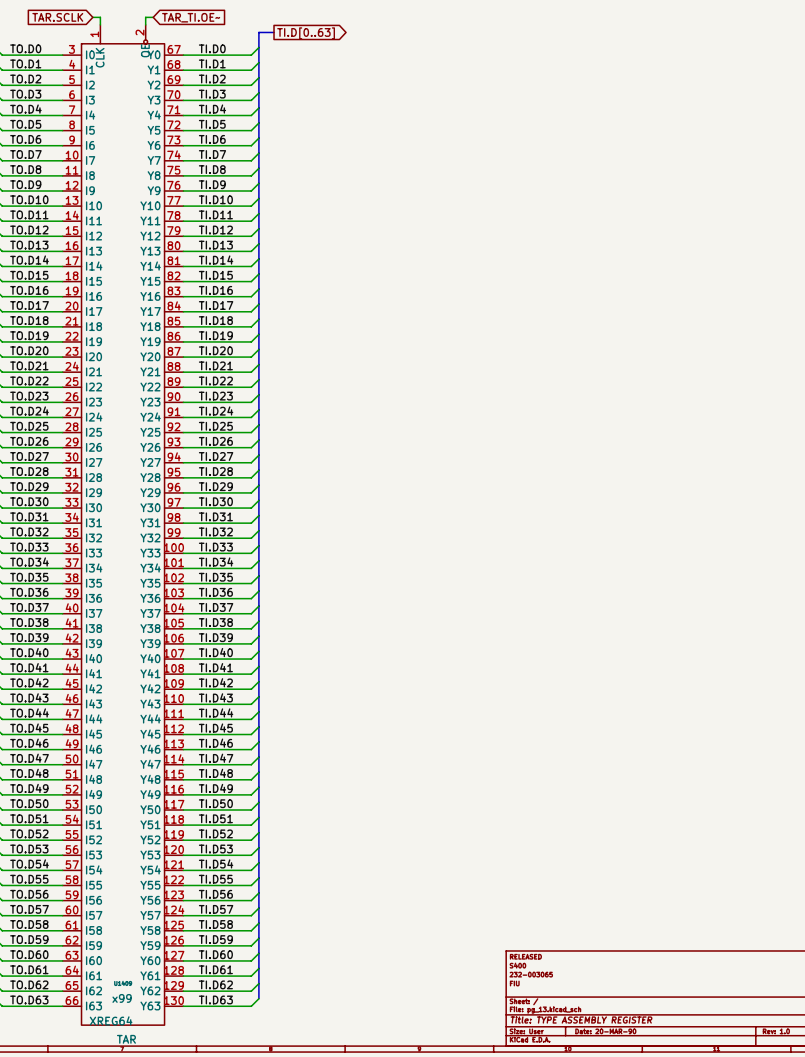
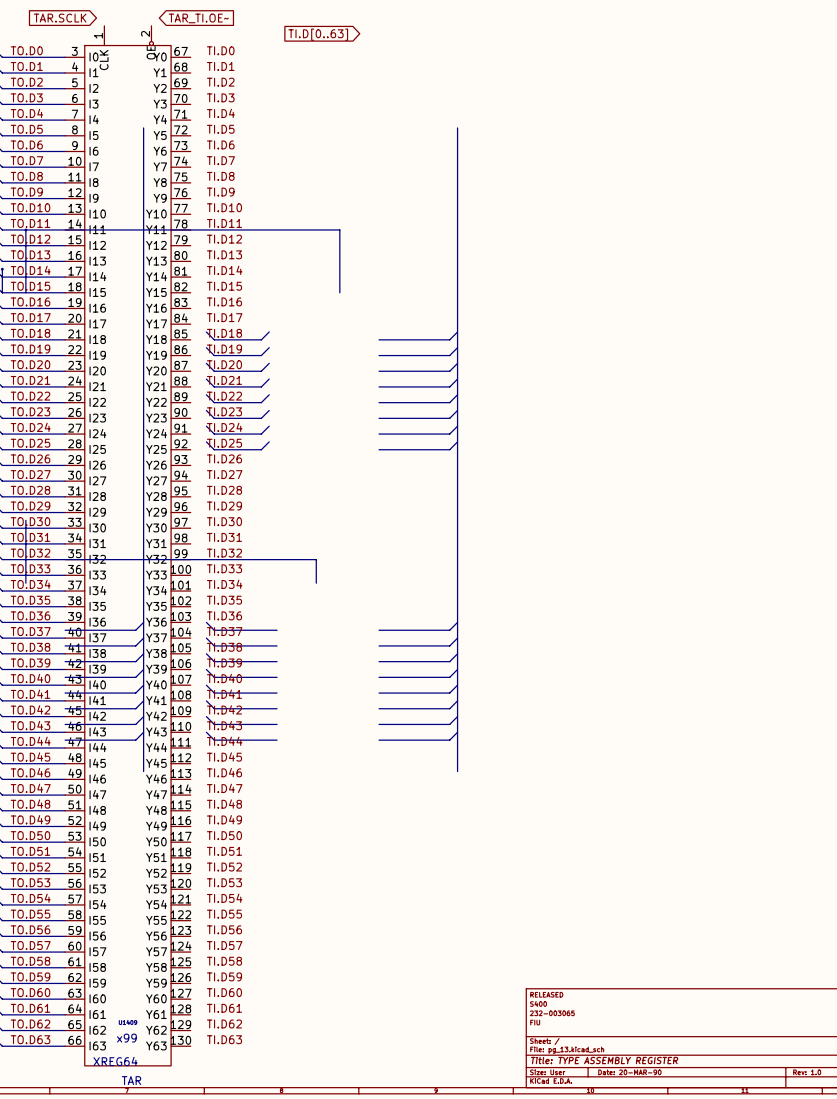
wire: (92, 17) (100, 17) (100, 24) -> none
wire: (153, 17) (145, 17) (145, 24) -> none
bus: (274, 32) (258, 32) (258, 998) -> none
wire: (258, 47) (251, 55) (183, 55) -> none
wire: (258, 62) (251, 70) (183, 70) -> none
wire: (258, 77) (251, 85) (183, 85) -> none
wire: (258, 92) (251, 100) (183, 100) -> none
wire: (258, 107) (251, 115) (183, 115) -> none
bus: none -> (143, 127) (143, 771)
wire: (258, 123) (251, 130) (183, 130) -> none
bus: none -> (457, 127) (457, 771)
wire: (258, 138) (251, 145) (183, 145) -> none
wire: (258, 153) (251, 160) (183, 160) -> none
wire: (258, 168) (251, 175) (183, 175) -> none
wire: (258, 183) (251, 191) (183, 191) -> none
wire: (258, 198) (251, 206) (183, 206) -> none
wire: (258, 213) (251, 221) -> (339, 292) (339, 229) (261, 229)
wire: none -> (25, 229) (25, 292)
wire: none -> (65, 229) (190, 229)
wire: (258, 228) (251, 236) (183, 236) -> none
wire: (258, 243) (251, 251) (183, 251) -> none
wire: none -> (2, 269) (2, 292)
junction: none -> (2, 269)
wire: (258, 258) (251, 266) (183, 266) -> none
wire: (258, 274) (251, 281) (183, 281) -> none
wire: (258, 289) (251, 296) (183, 296) -> none
wire: (258, 304) (251, 311) (183, 311) -> none
wire: none -> (457, 332) (449, 339) (379, 339)
wire: (183, 326) (206, 326) -> (206, 332) (214, 339)
wire: none -> (457, 347) (449, 355) (379, 355)
wire: (183, 341) (206, 341) -> (206, 347) (214, 355)
wire: none -> (457, 363) (449, 371) (379, 371)
wire: (183, 357) (206, 357) -> (206, 363) (214, 371)
wire: none -> (457, 379) (449, 386) (379, 386)
wire: (183, 372) (206, 372) -> (206, 379) (214, 386)
wire: none -> (457, 394) (449, 402) (379, 402)
wire: (183, 387) (206, 387) -> (206, 394) (214, 402)
wire: none -> (457, 410) (449, 418) (379, 418)
wire: (183, 402) (206, 402) -> (206, 410) (214, 418)
wire: none -> (457, 426) (449, 434) (379, 434)
wire: (183, 417) (206, 417) -> (206, 426) (214, 434)
wire: none -> (457, 441) (449, 449) (379, 449)
wire: (183, 432) (206, 432) -> (206, 441) (214, 449)
wire: (258, 440) (251, 447) (183, 447) -> none
wire: (258, 455) (251, 462) (183, 462) -> none
wire: (258, 470) (251, 477) (183, 477) -> none
wire: (258, 485) (251, 492) (183, 492) -> none
wire: none -> (25, 520) (25, 583)
wire: (258, 500) (251, 508) (183, 508) -> none
wire: (258, 515) (251, 523) (183, 523) -> none
wire: (258, 530) (251, 538) -> (316, 583) (316, 559) (261, 559)
wire: none -> (65, 559) (190, 559)
wire: (258, 545) (251, 553) (183, 553) -> none
wire: (258, 560) (251, 568) (183, 568) -> none
wire: (258, 575) (251, 583) (183, 583) -> none
wire: (258, 591) (251, 598) (183, 598) -> none
wire: none -> (143, 622) (135, 630) (65, 630)
wire: none -> (206, 622) (214, 630) (277, 630)
wire: none -> (457, 622) (449, 630) (379, 630)
wire: (258, 606) (251, 613) (183, 613) -> none
wire: none -> (143, 638) (135, 645) (65, 645)
wire: none -> (206, 638) (214, 645) (277, 645)
wire: none -> (457, 638) (449, 645) (379, 645)
wire: (258, 621) (251, 628) (183, 628) -> none
wire: none -> (143, 653) (135, 661) (65, 661)
wire: none -> (206, 653) (214, 661) (277, 661)
wire: none -> (457, 653) (449, 661) (379, 661)
wire: (258, 636) (251, 643) (183, 643) -> none
wire: none -> (143, 669) (135, 677) (65, 677)
wire: none -> (206, 669) (214, 677) (277, 677)
wire: none -> (457, 669) (449, 677) (379, 677)
wire: (258, 651) (251, 659) (183, 659) -> none
wire: none -> (143, 685) (135, 693) (65, 693)
wire: none -> (206, 685) (214, 693) (277, 693)
wire: none -> (457, 685) (449, 693) (379, 693)
wire: (258, 666) (251, 674) (183, 674) -> none
wire: none -> (143, 700) (135, 708) (65, 708)
wire: none -> (206, 700) (214, 708) (277, 708)
wire: none -> (457, 700) (449, 708) (379, 708)
wire: (258, 681) (251, 689) (183, 689) -> none
wire: none -> (143, 716) (135, 724) (65, 724)
wire: none -> (206, 716) (214, 724) (277, 724)
wire: none -> (457, 716) (449, 724) (379, 724)
wire: (258, 696) (251, 704) (183, 704) -> none
wire: none -> (143, 732) (135, 740) (65, 740)
wire: none -> (206, 732) (214, 740) (277, 740)
wire: none -> (457, 732) (449, 740) (379, 740)
wire: (258, 711) (251, 719) (183, 719) -> none
wire: (258, 726) (251, 734) (183, 734) -> none
wire: (258, 742) (251, 749) (183, 749) -> none
wire: (258, 757) (251, 764) (183, 764) -> none
wire: (258, 772) (251, 779) (183, 779) -> none
wire: (258, 787) (251, 794) (183, 794) -> none
wire: (258, 802) (251, 810) (183, 810) -> none
wire: (258, 817) (251, 825) (183, 825) -> none
wire: (258, 832) (251, 840) (183, 840) -> none
wire: (258, 847) (251, 855) (183, 855) -> none
wire: (258, 862) (251, 870) (183, 870) -> none
wire: (258, 877) (251, 885) (183, 885) -> none
wire: (258, 893) (251, 900) (183, 900) -> none
wire: (258, 908) (251, 915) (183, 915) -> none
wire: (258, 923) (251, 930) (183, 930) -> none
wire: (258, 938) (251, 945) (183, 945) -> none
wire: (258, 953) (251, 960) (183, 960) -> none
wire: (258, 968) (251, 976) (183, 976) -> none
wire: (258, 983) (251, 991) (183, 991) -> none
wire: (258, 998) (251, 1006) (183, 1006) -> none

